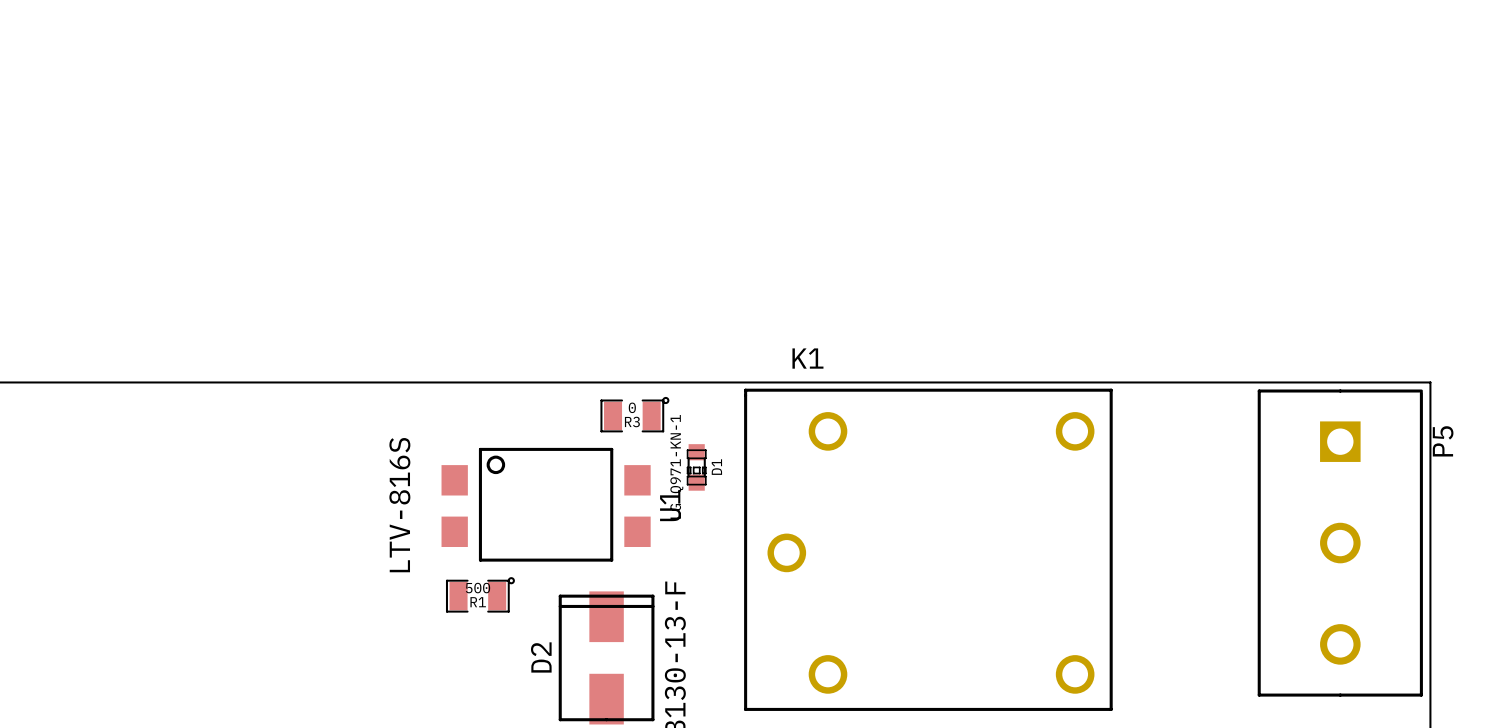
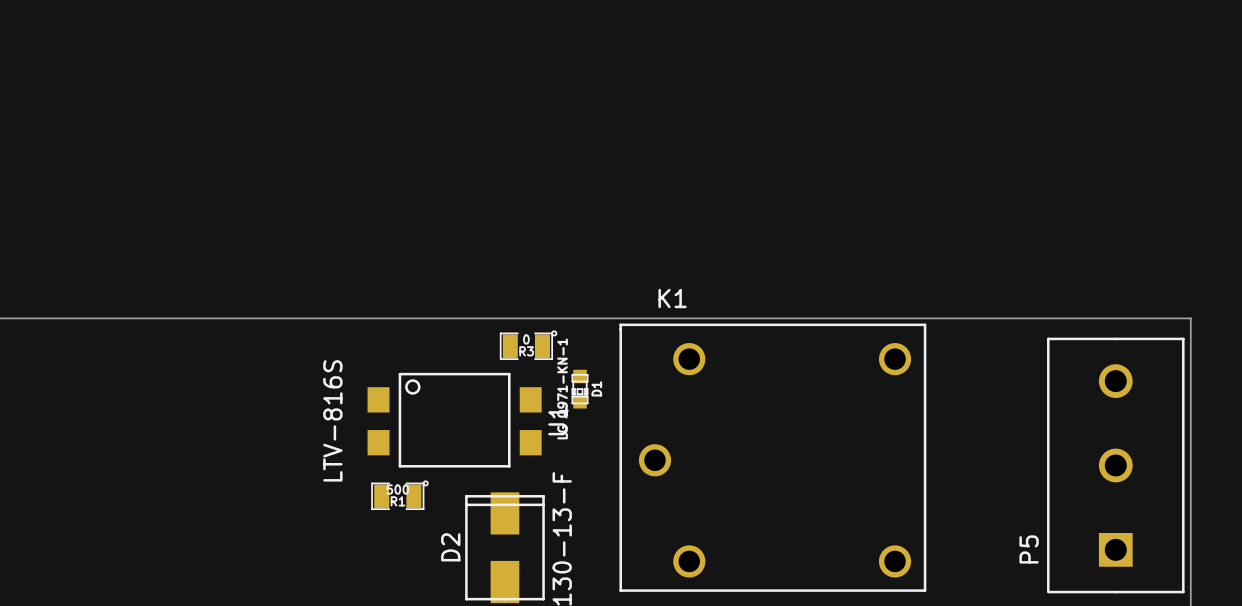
P5 rotation: 0° (1340, 543) -> 180° (1115, 465)

